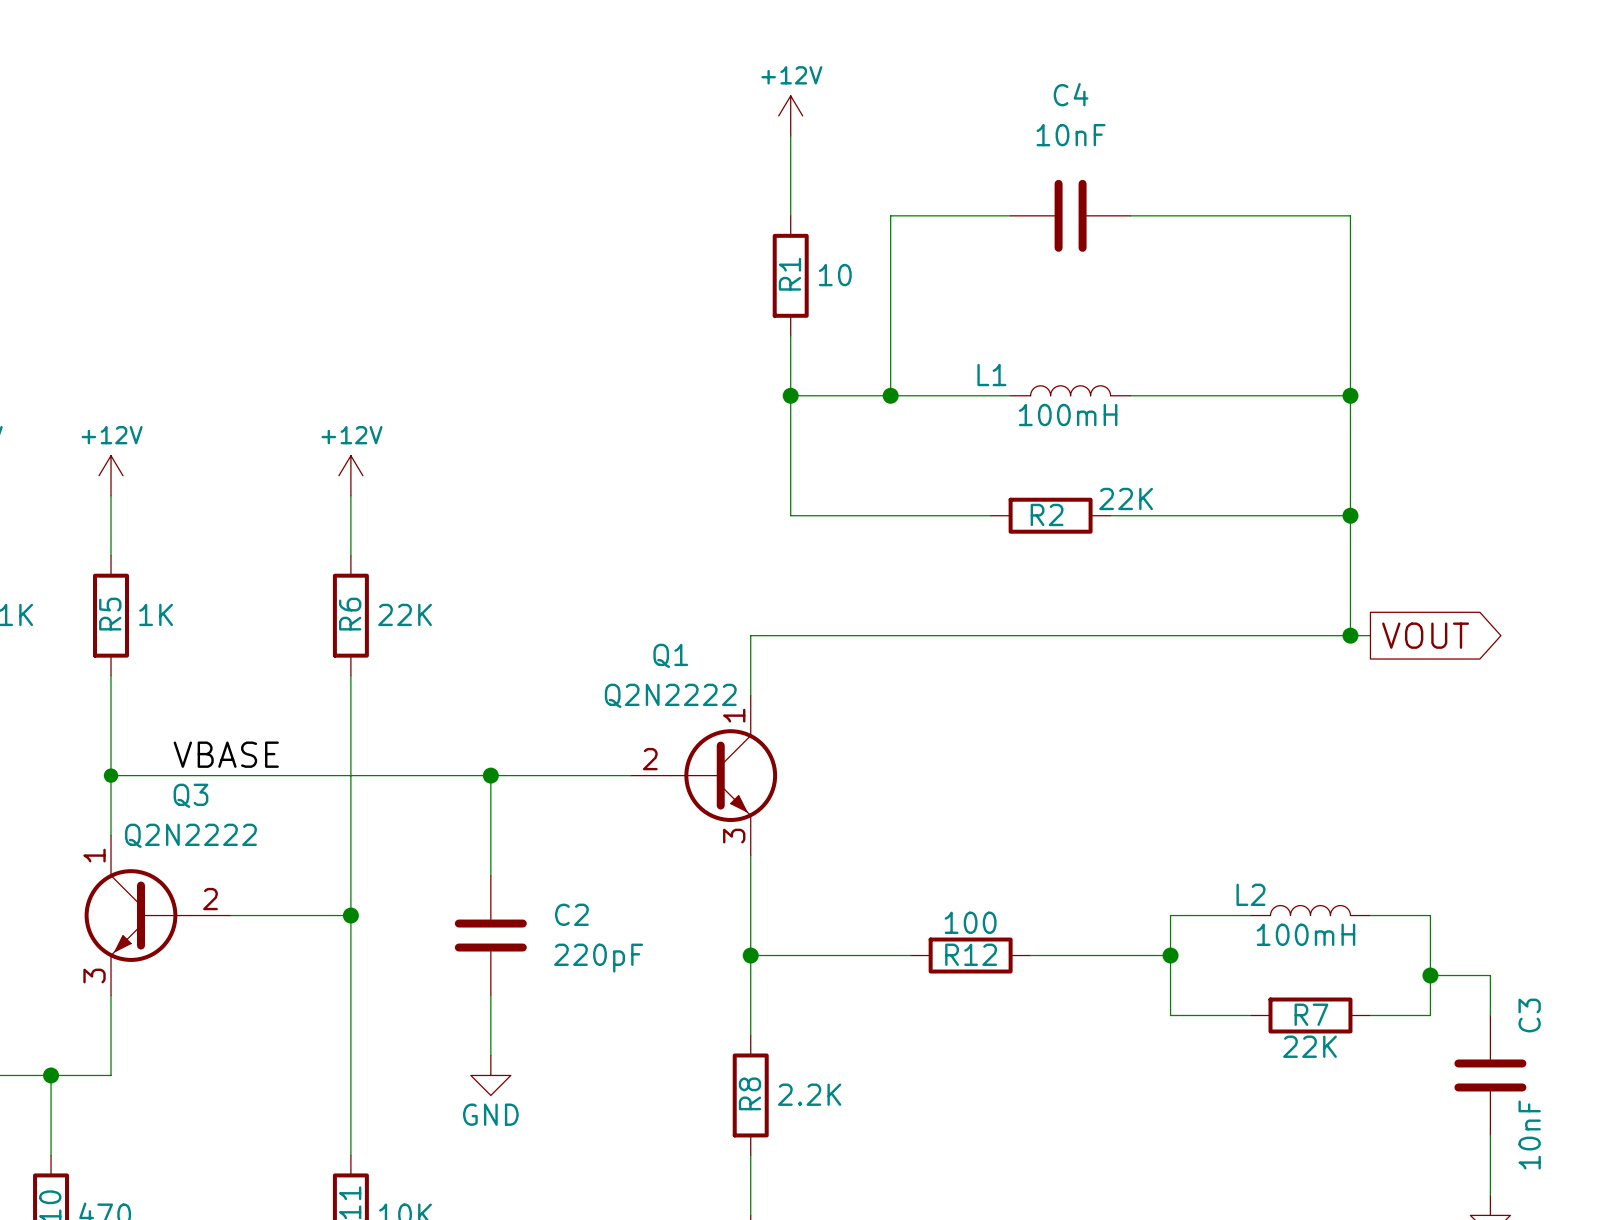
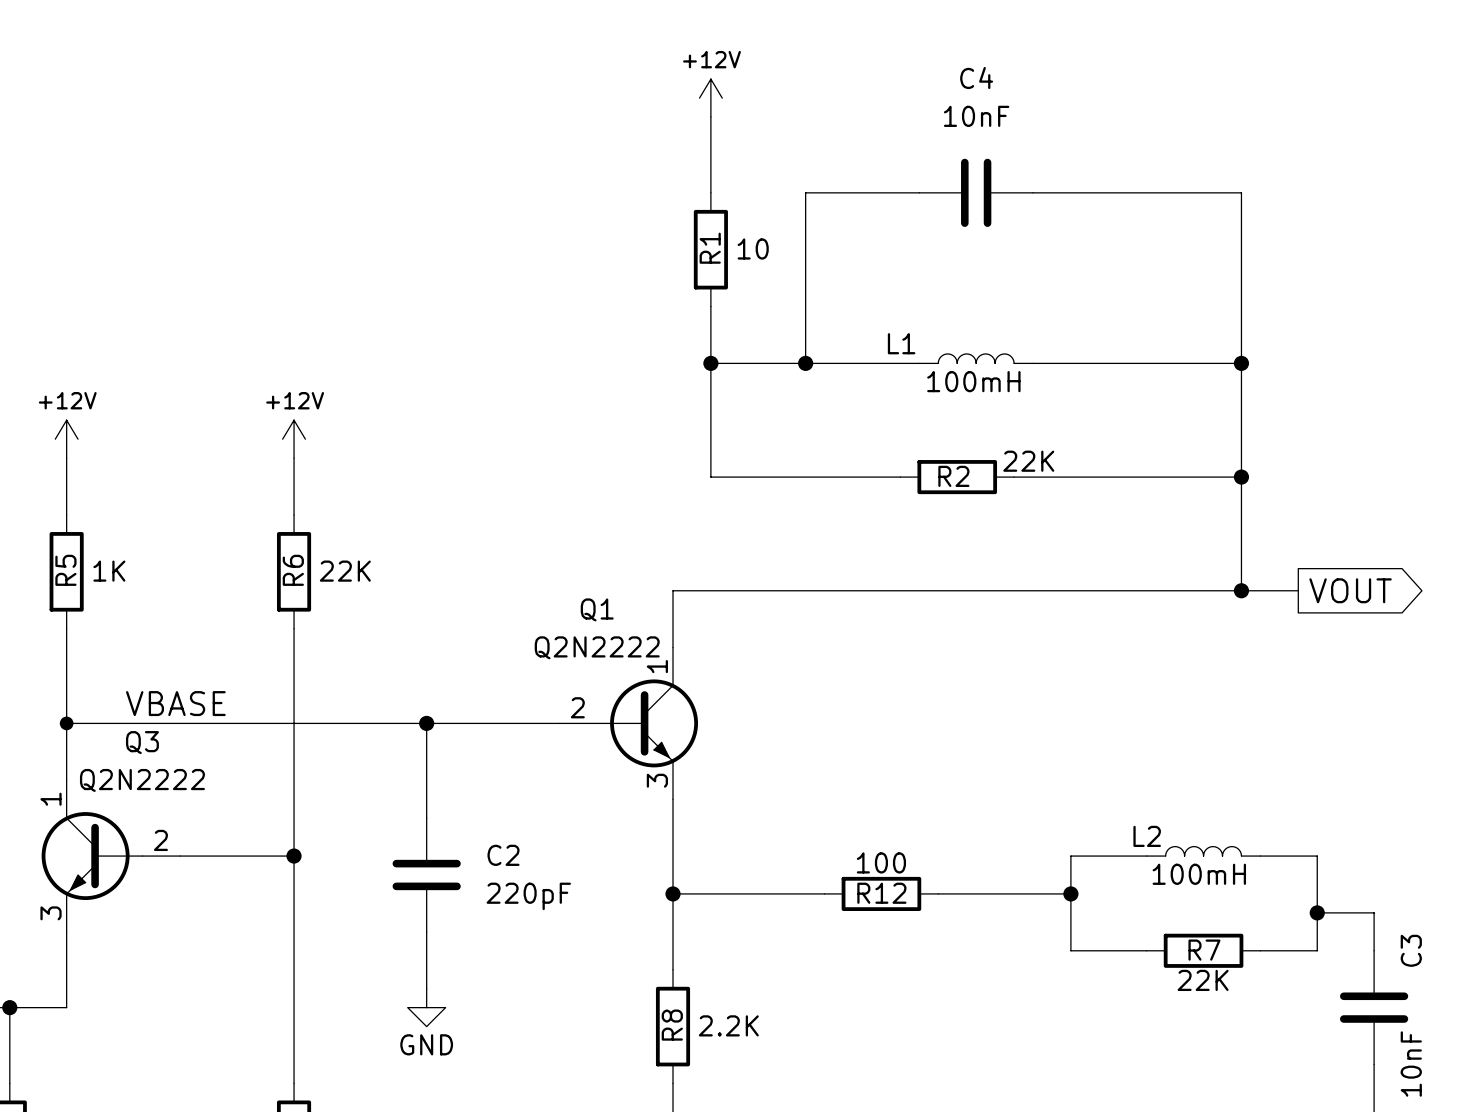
wire: none -> (1260, 590) (1298, 590)
global label position: VOUT (1425, 635) -> VOUT (1350, 590)

